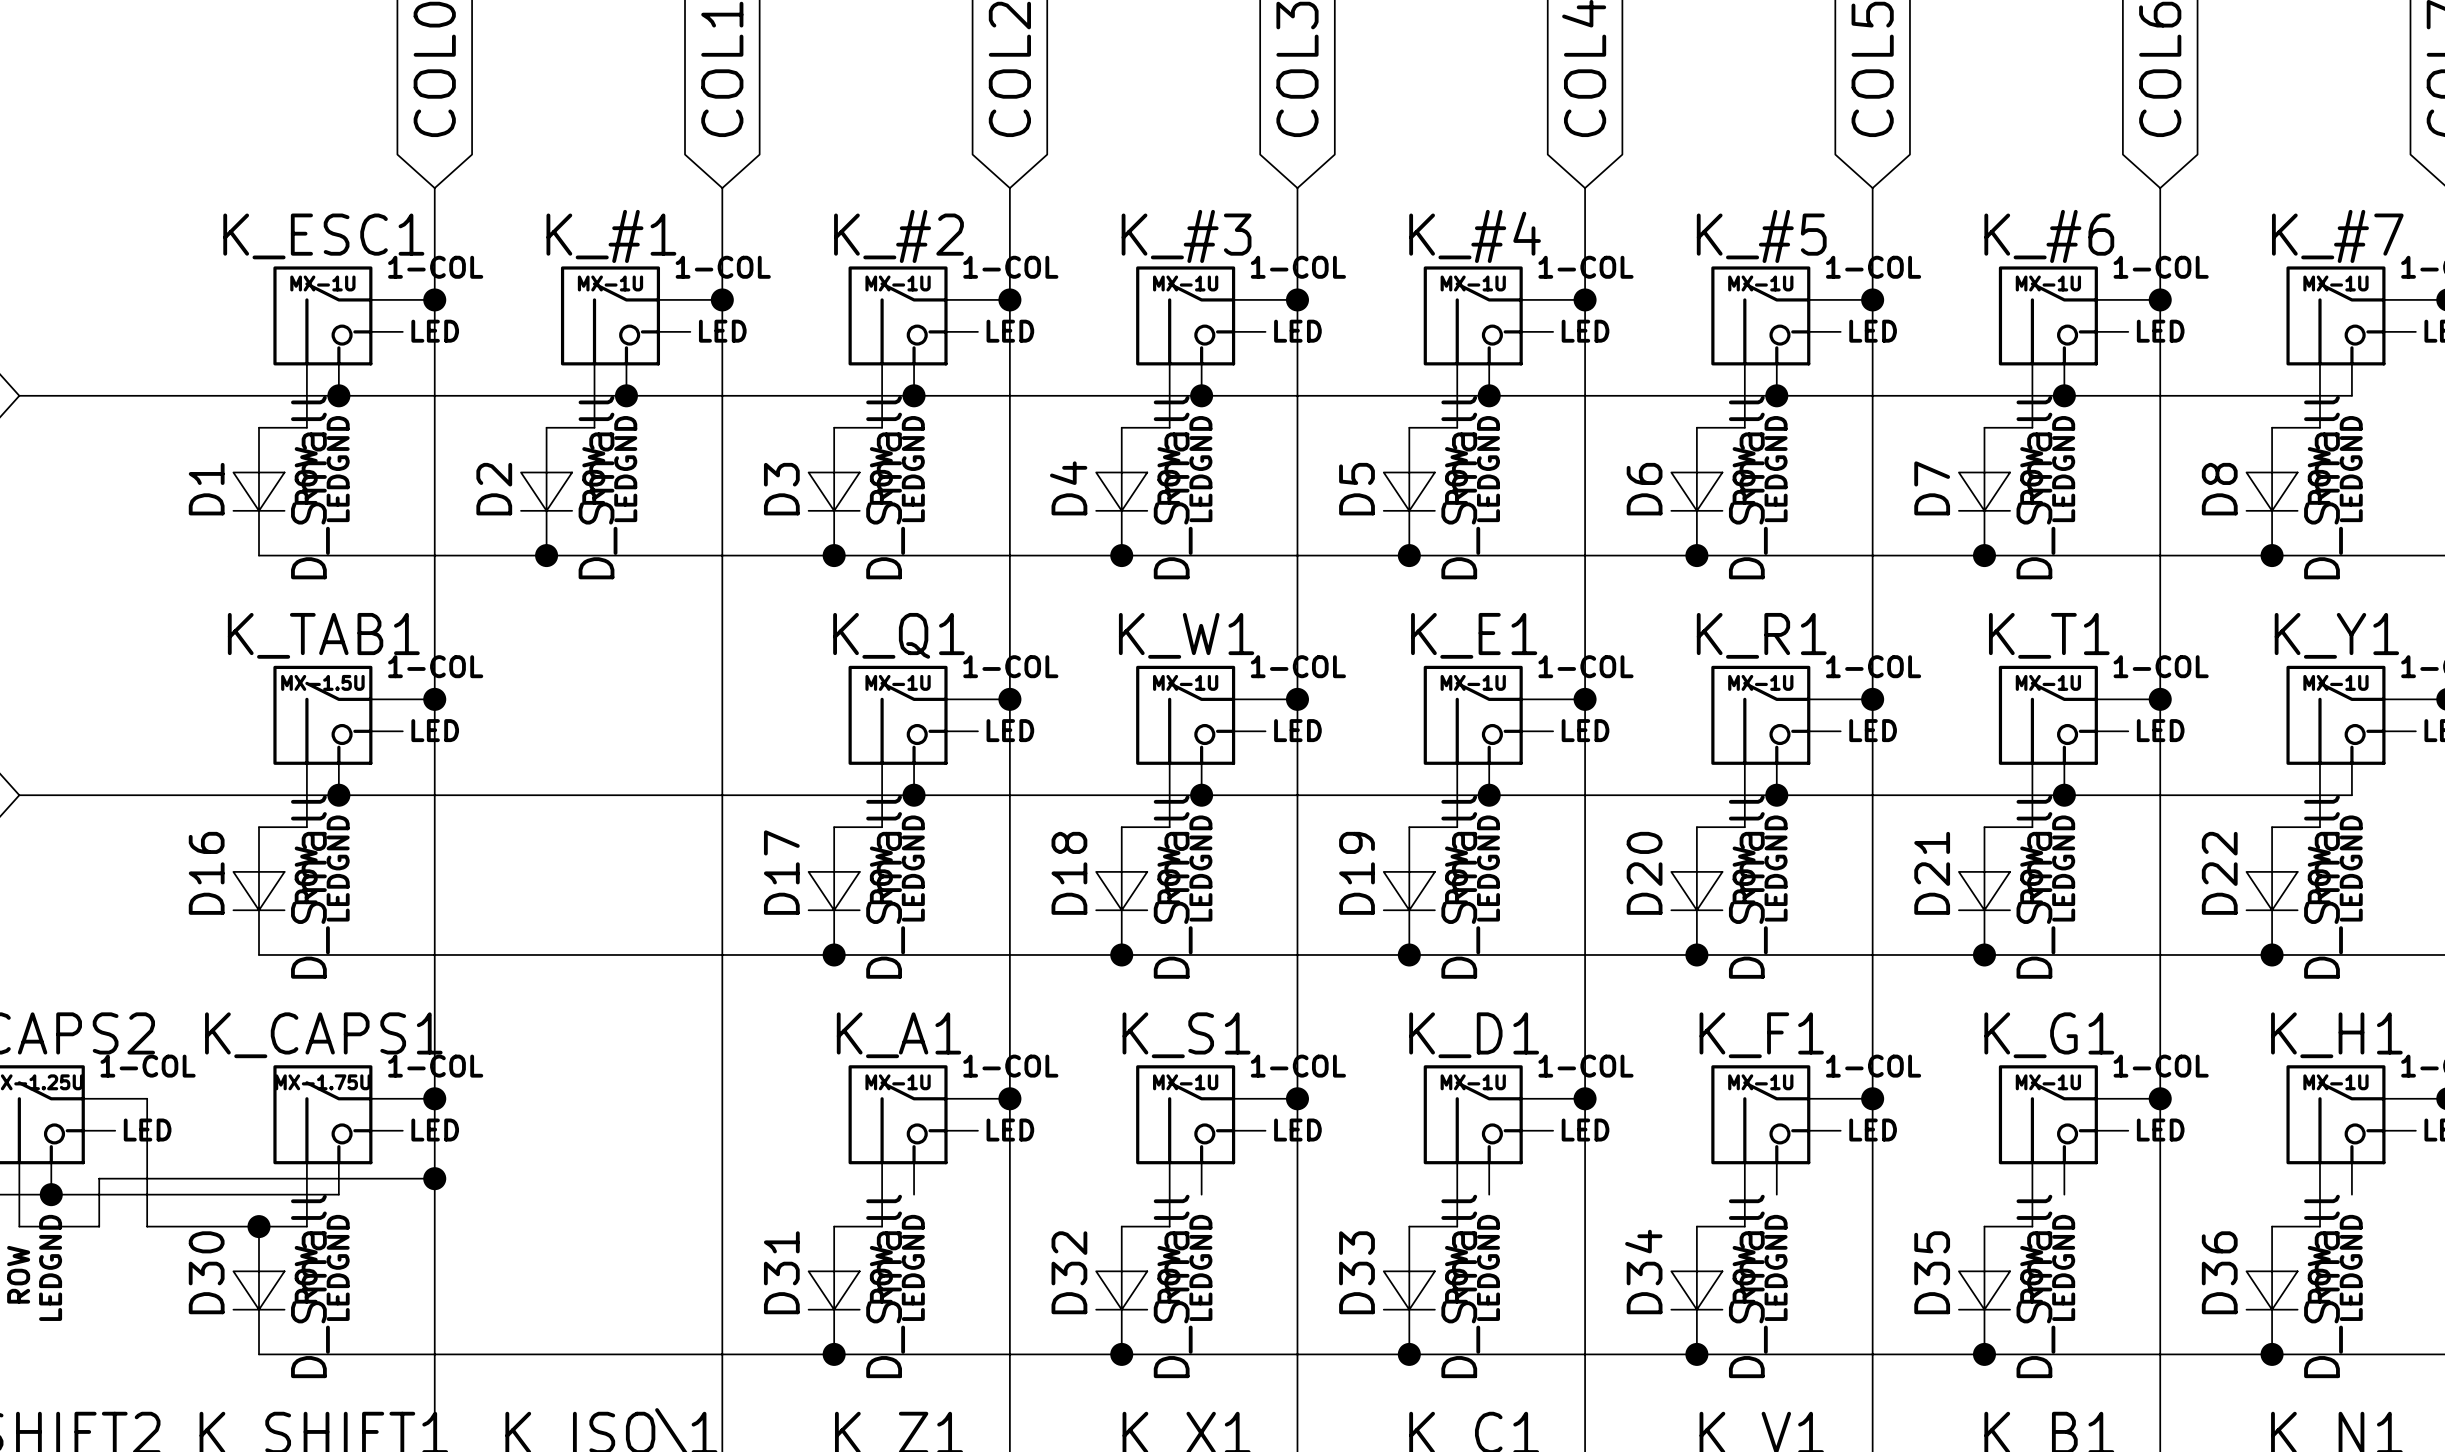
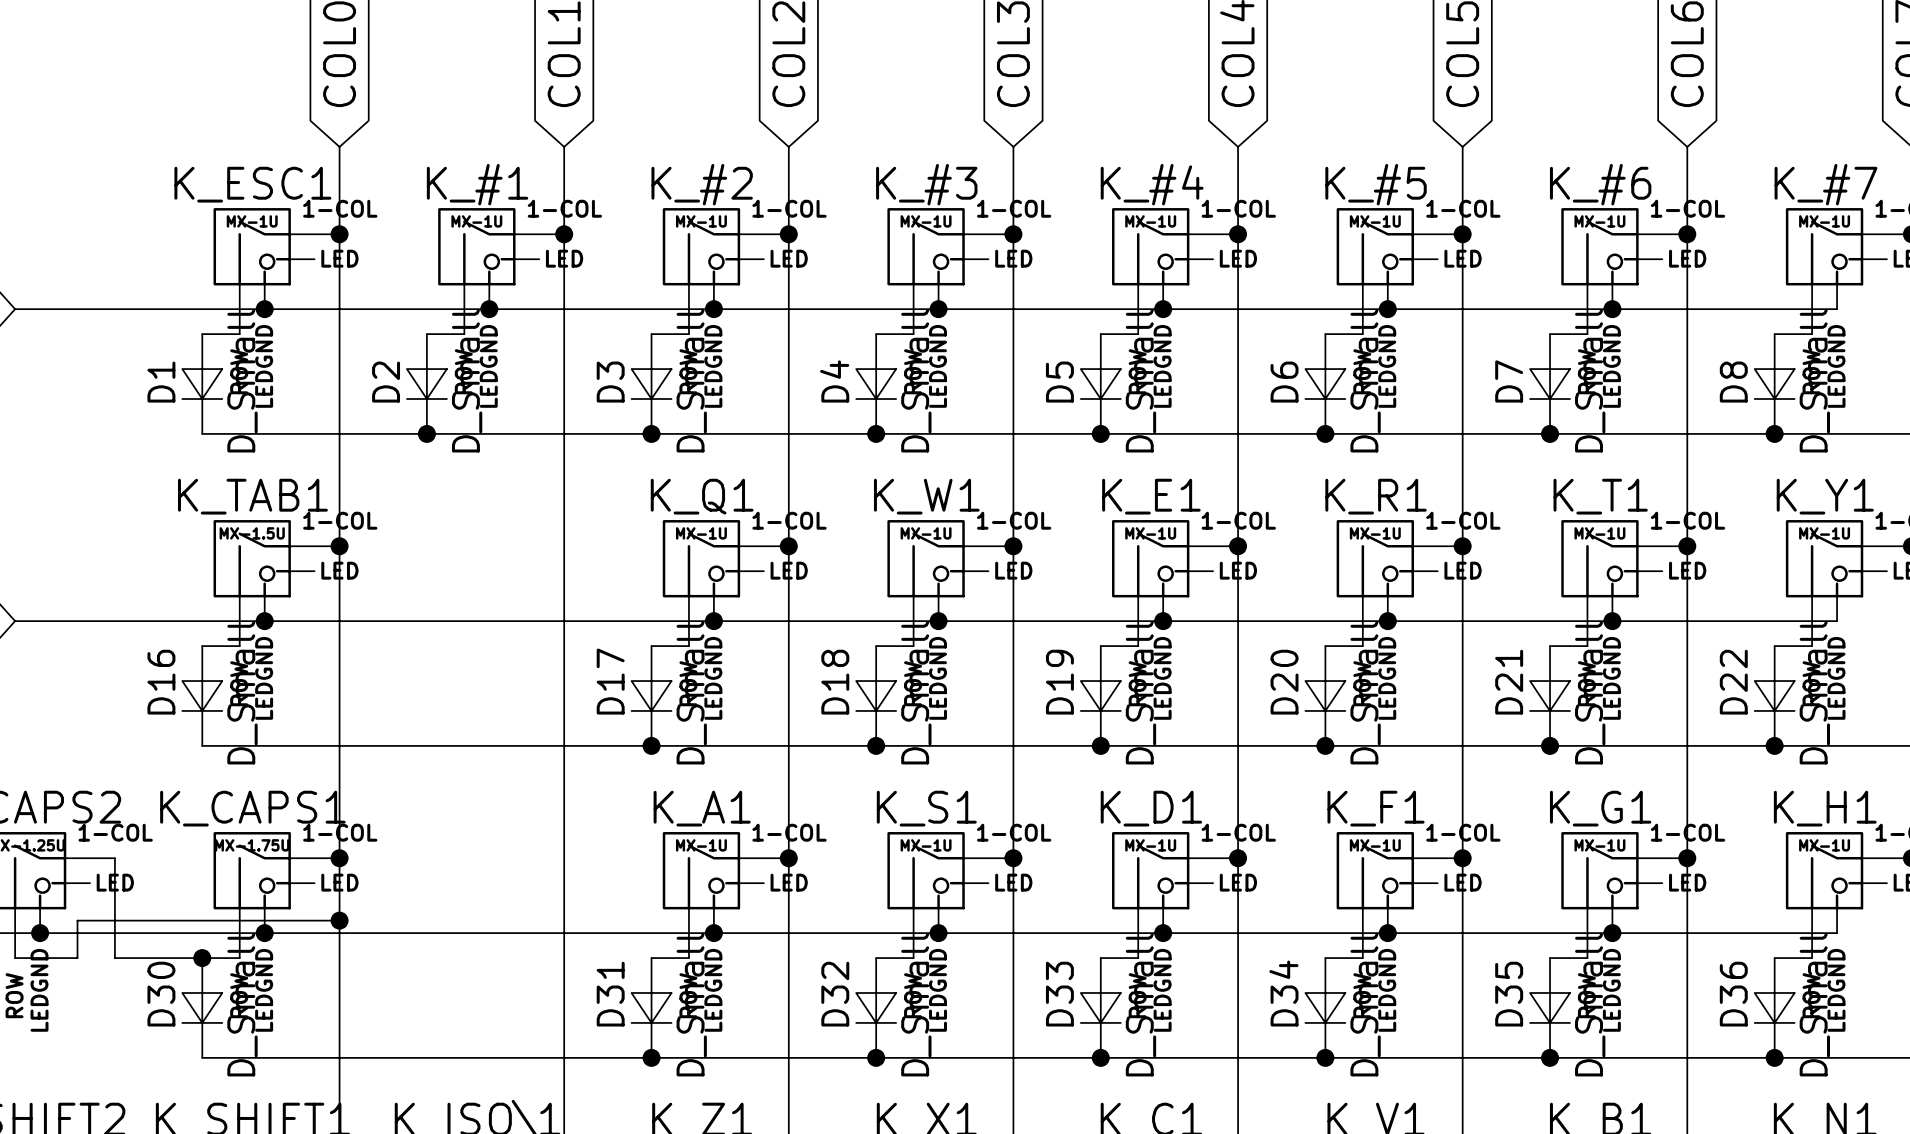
wire: none -> (264, 933) (1837, 933)
junction: none -> (264, 933)
junction: none -> (713, 933)
junction: none -> (938, 933)
junction: none -> (1163, 933)
junction: none -> (1387, 933)
junction: none -> (1612, 933)

